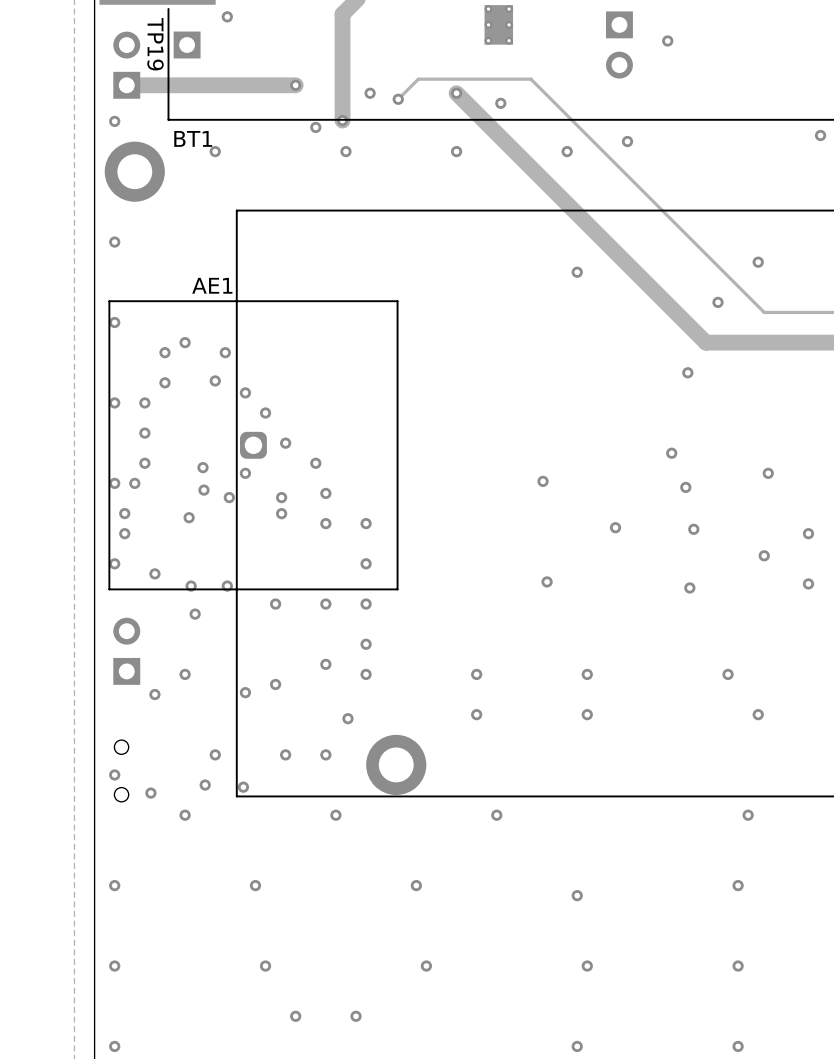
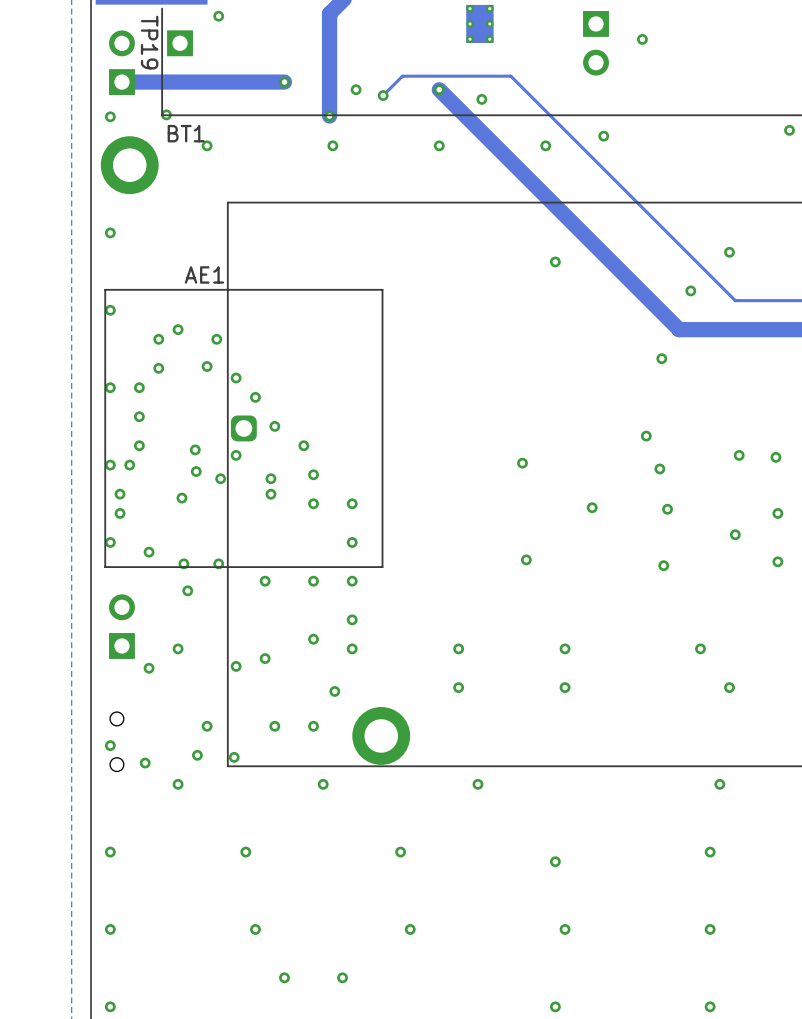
via: none -> (166, 114)
via: (315, 127) -> none
via: none -> (775, 457)

